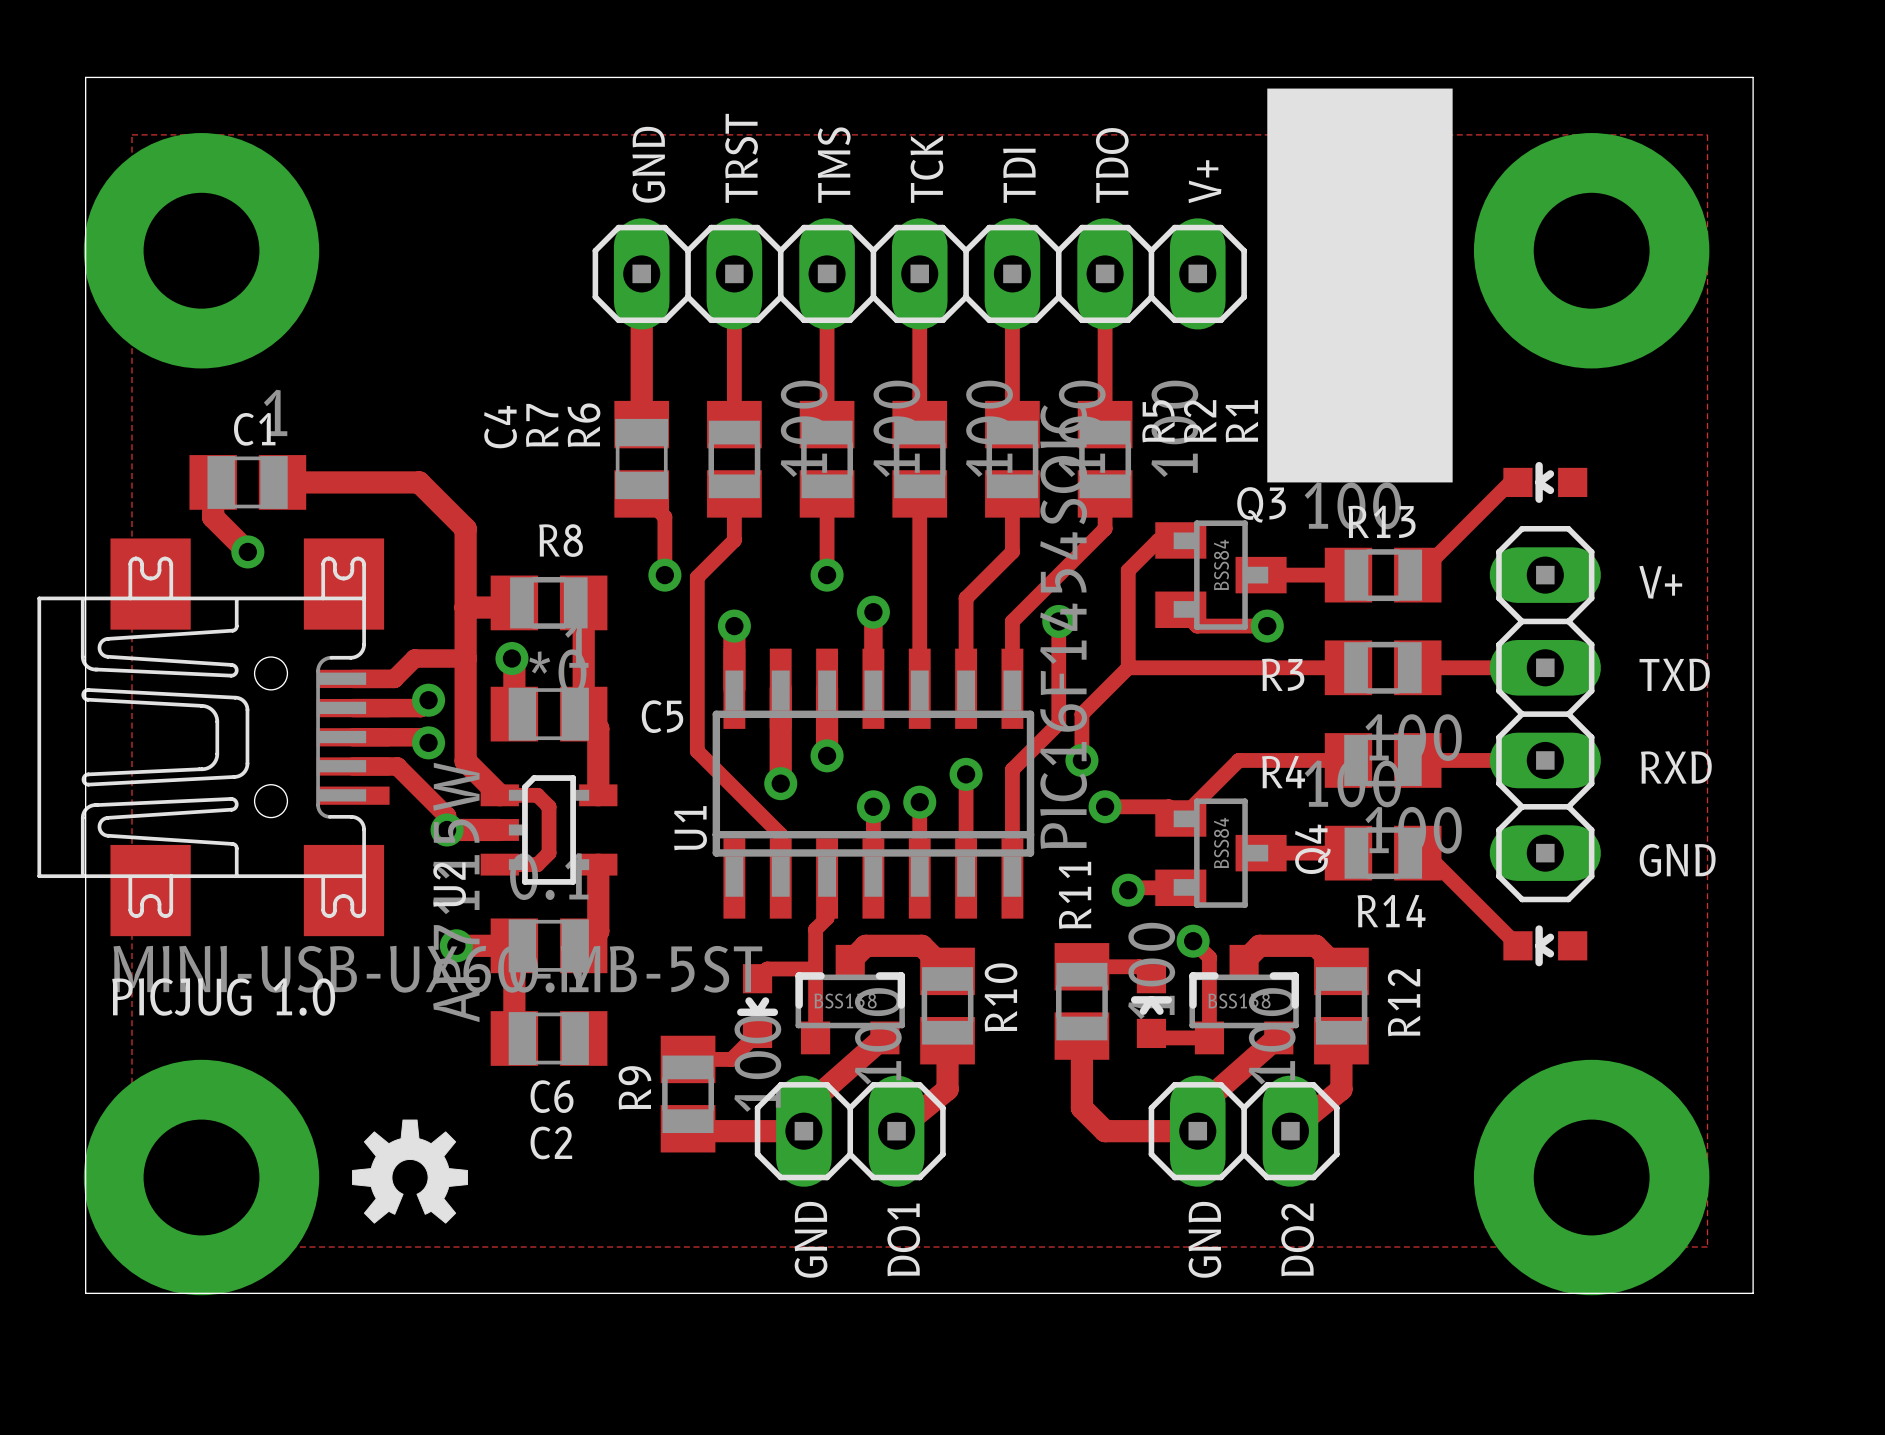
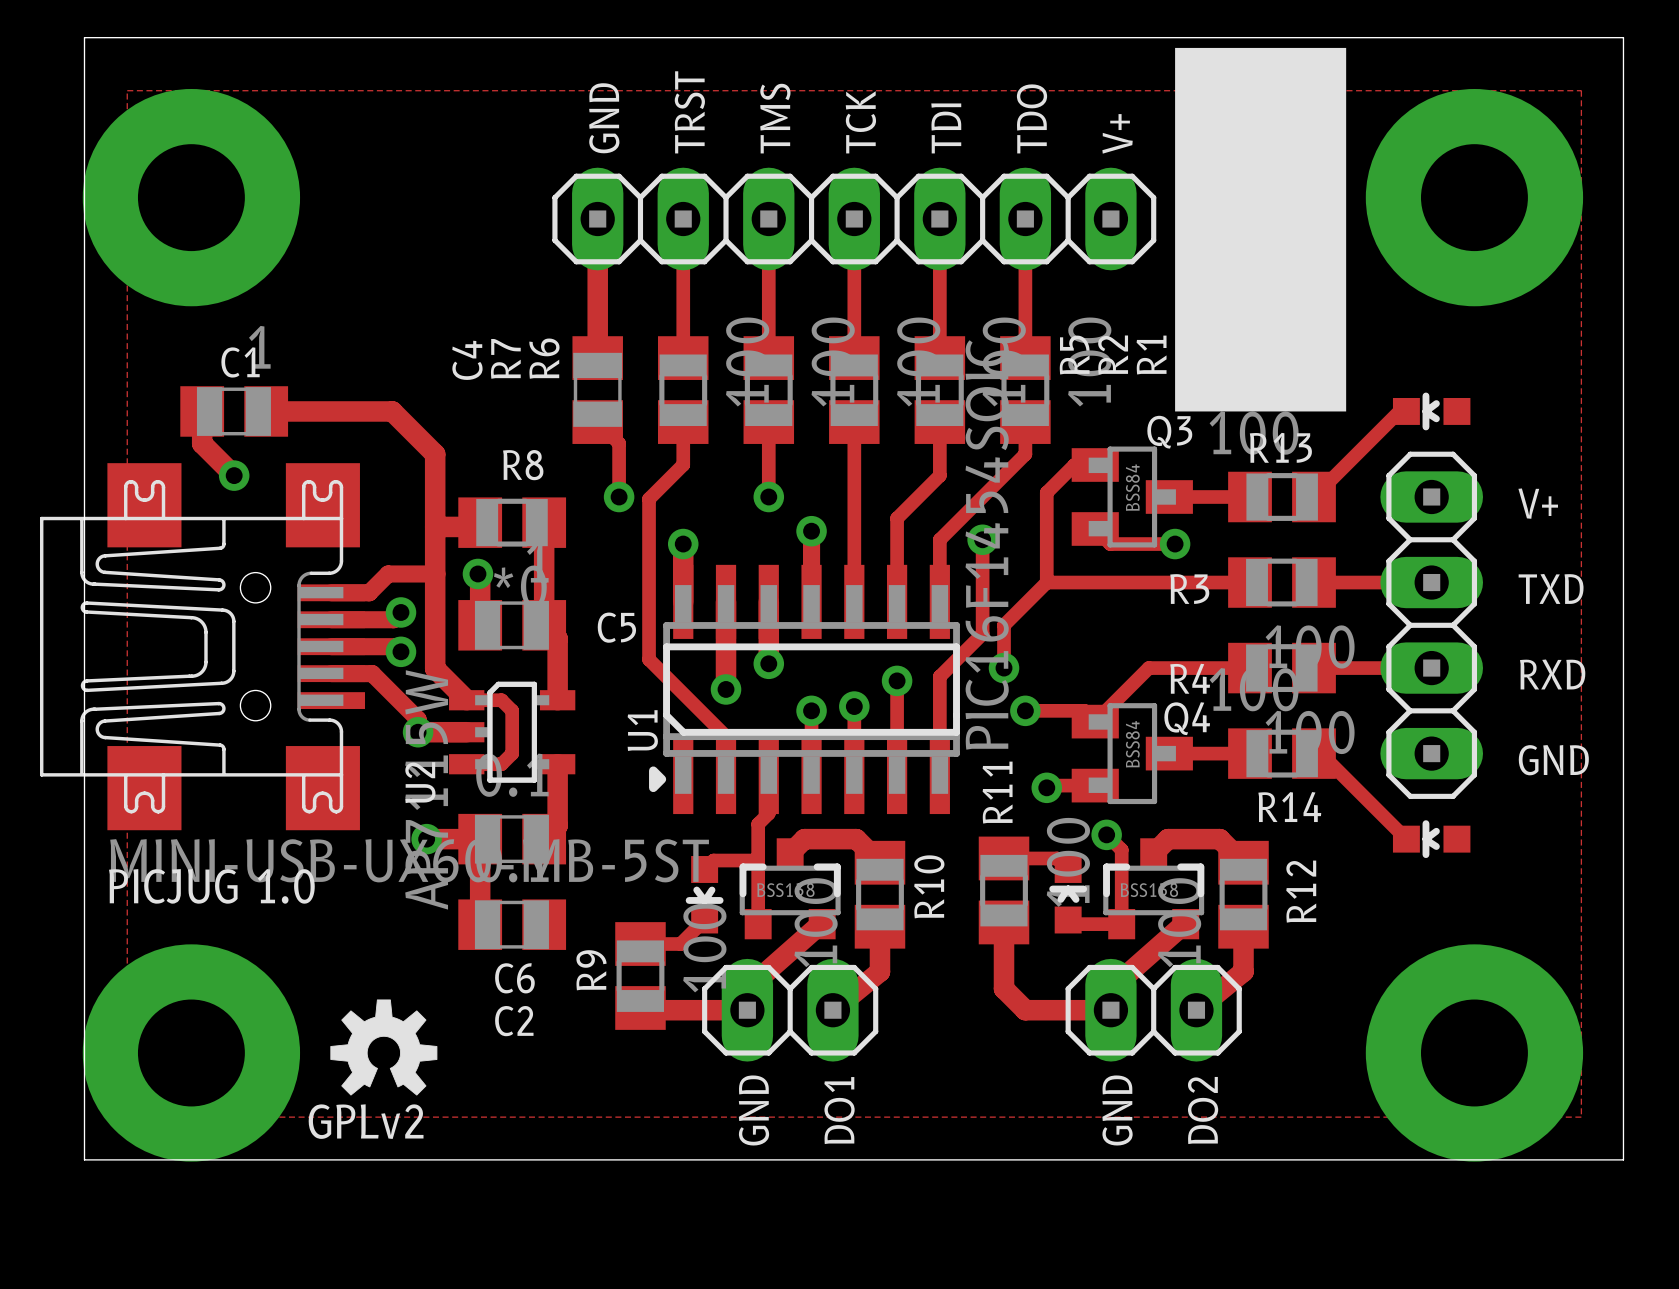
U1 footprint: [712, 648, 1035, 919] -> [649, 564, 960, 815]
Q4 name rotation: 0° (1312, 849) -> 90° clockwise (1187, 718)
text: none -> GPLv2 (366, 1121)

